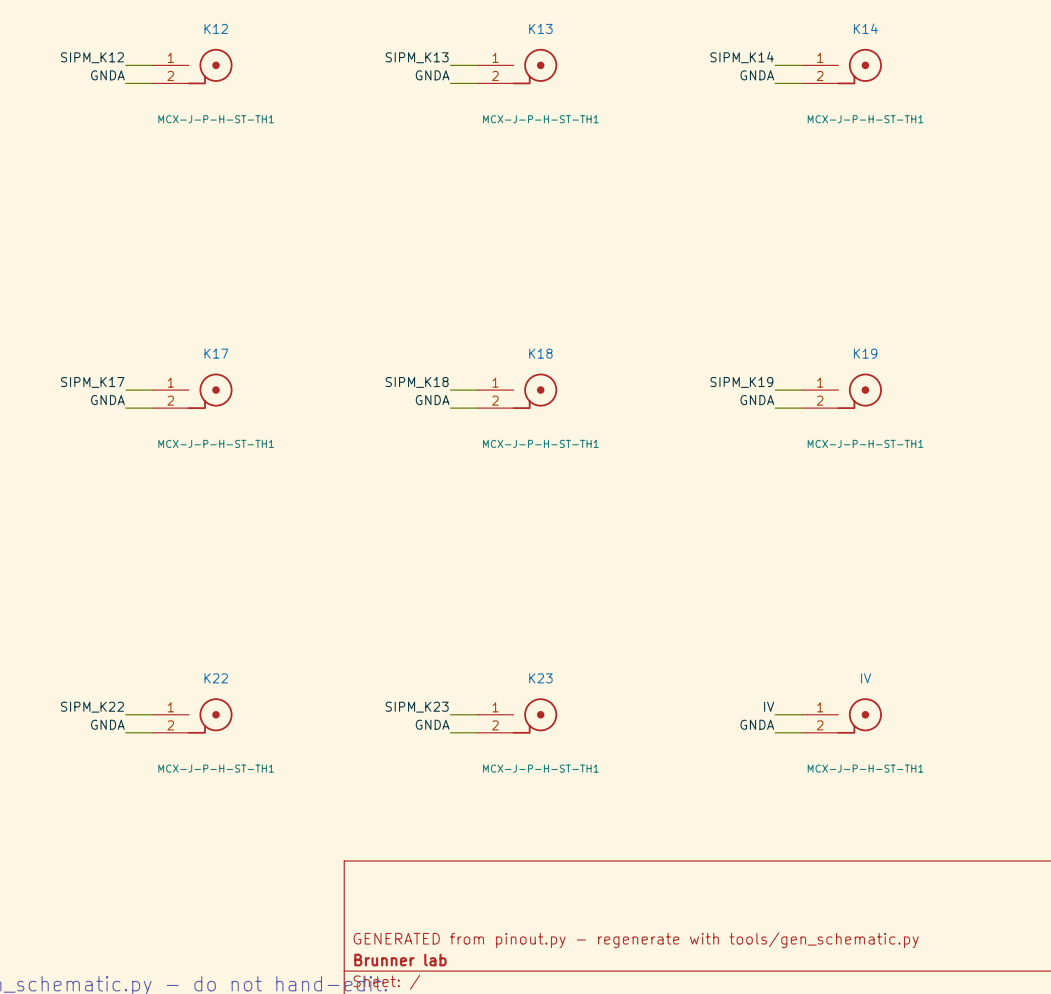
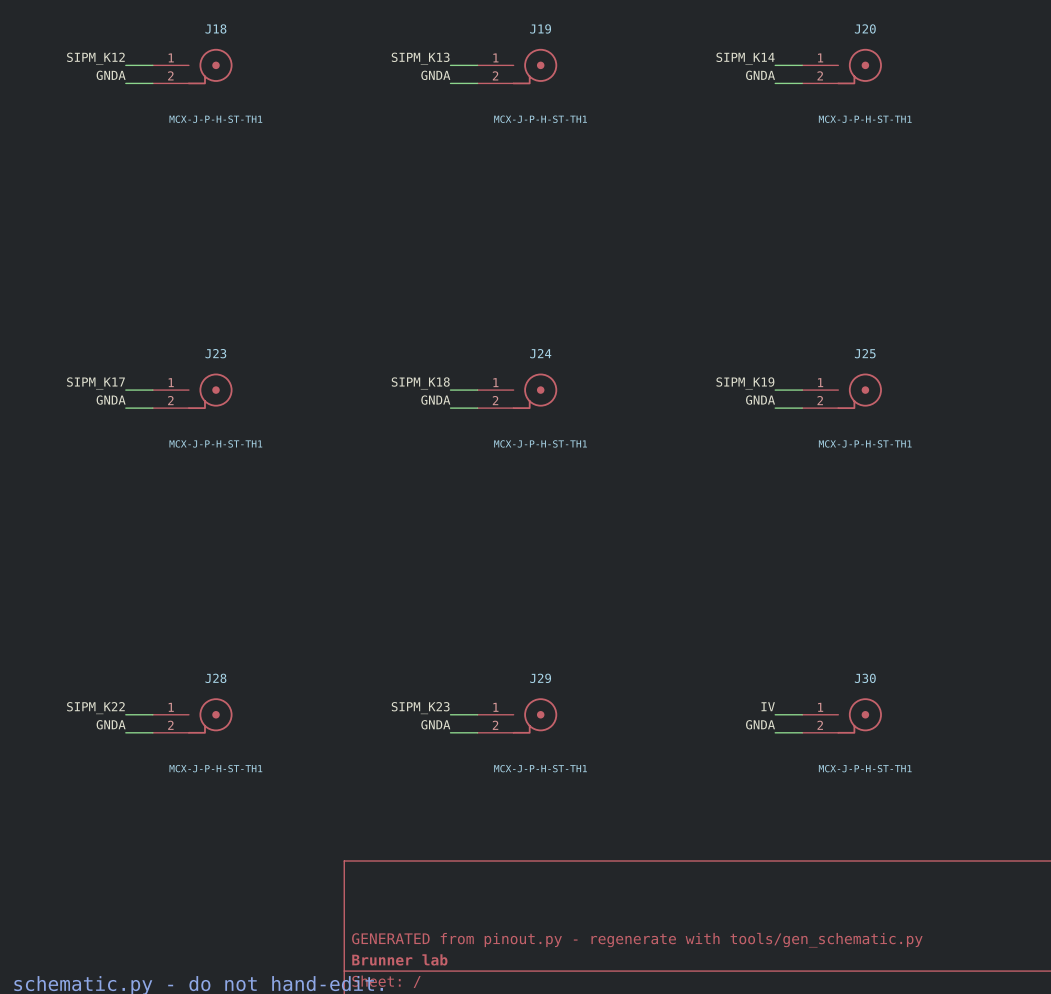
K12 name: K12 (216, 28) -> J18 (215, 28)
K13 name: K13 (540, 28) -> J19 (540, 28)
K14 name: K14 (865, 28) -> J20 (865, 28)
K17 name: K17 (216, 353) -> J23 (215, 353)
K18 name: K18 (540, 353) -> J24 (540, 353)
K19 name: K19 (865, 353) -> J25 (865, 353)
K22 name: K22 (216, 678) -> J28 (215, 678)
K23 name: K23 (540, 678) -> J29 (540, 678)
IV name: IV (866, 678) -> J30 (865, 678)

